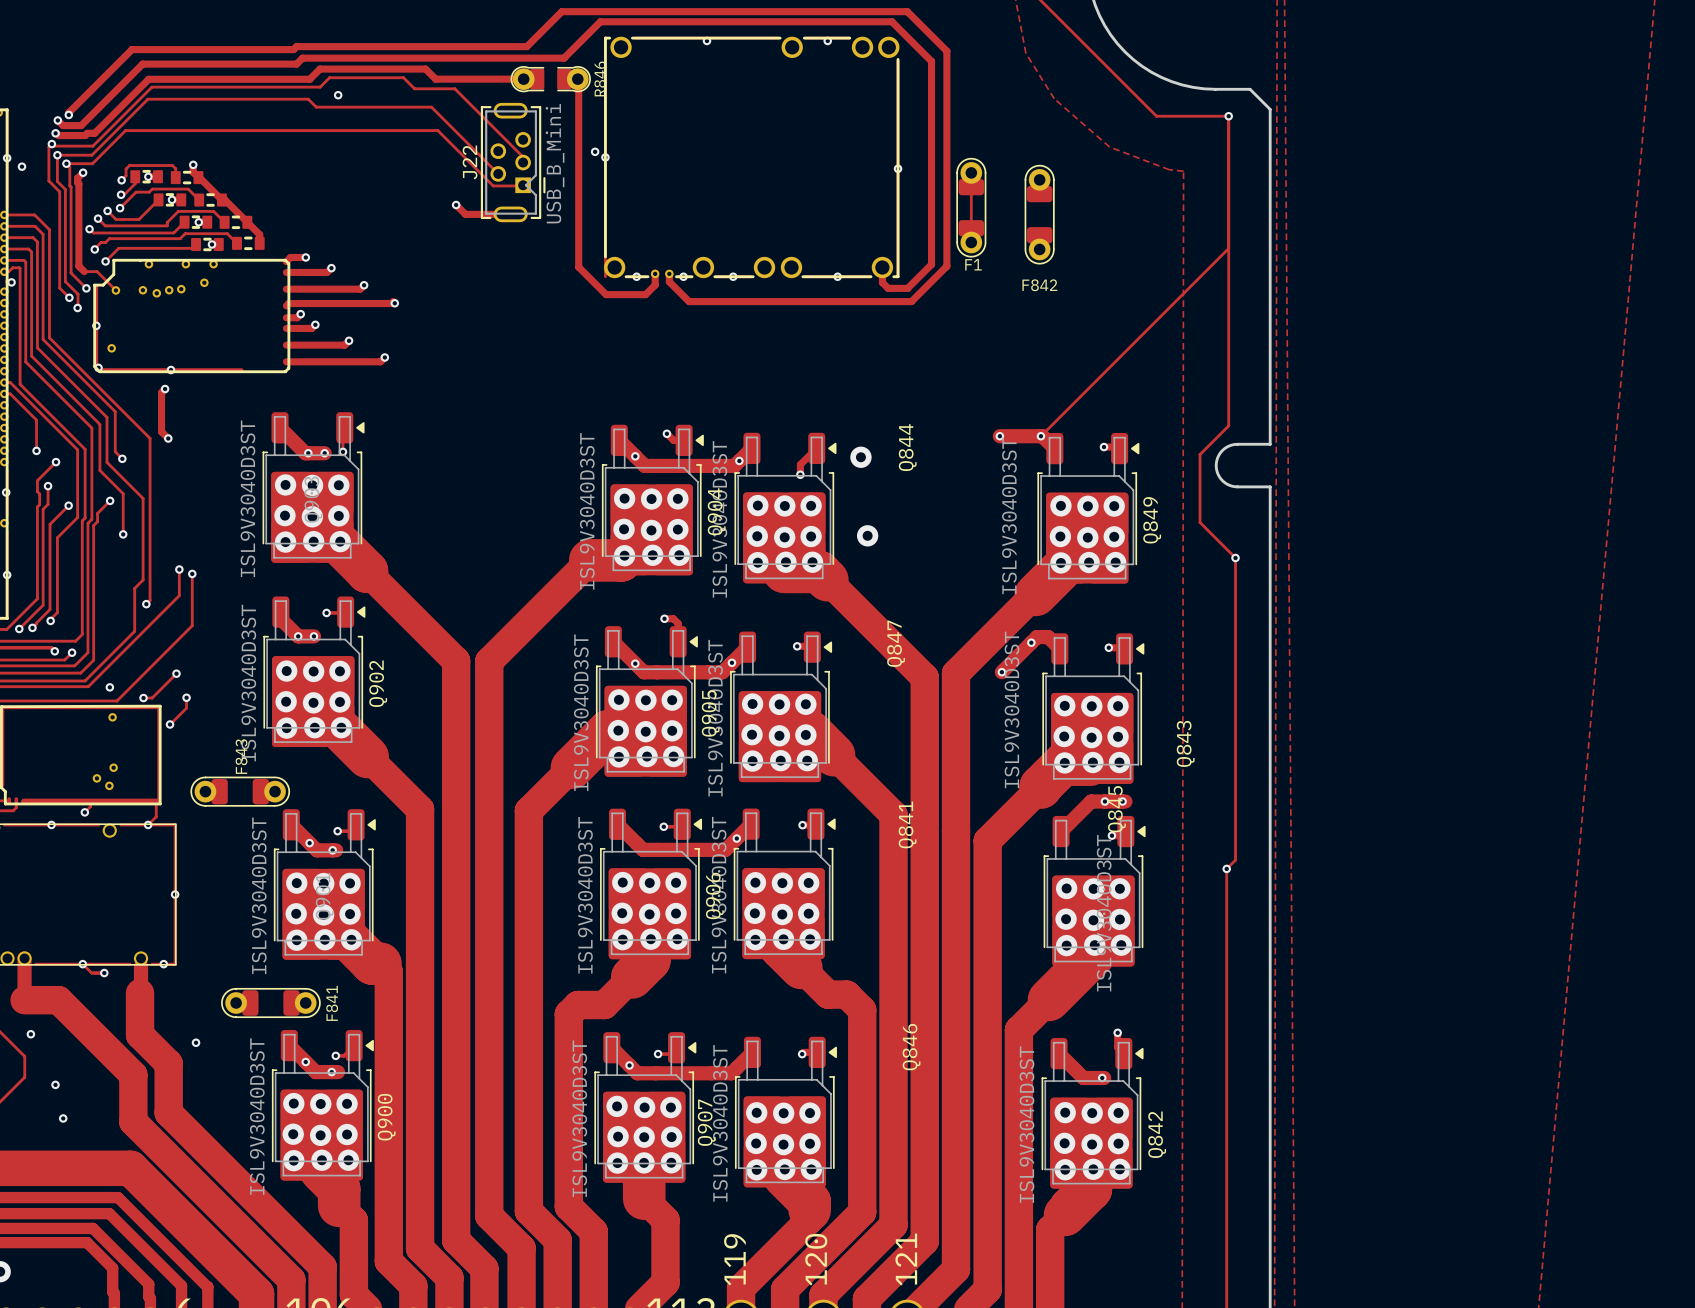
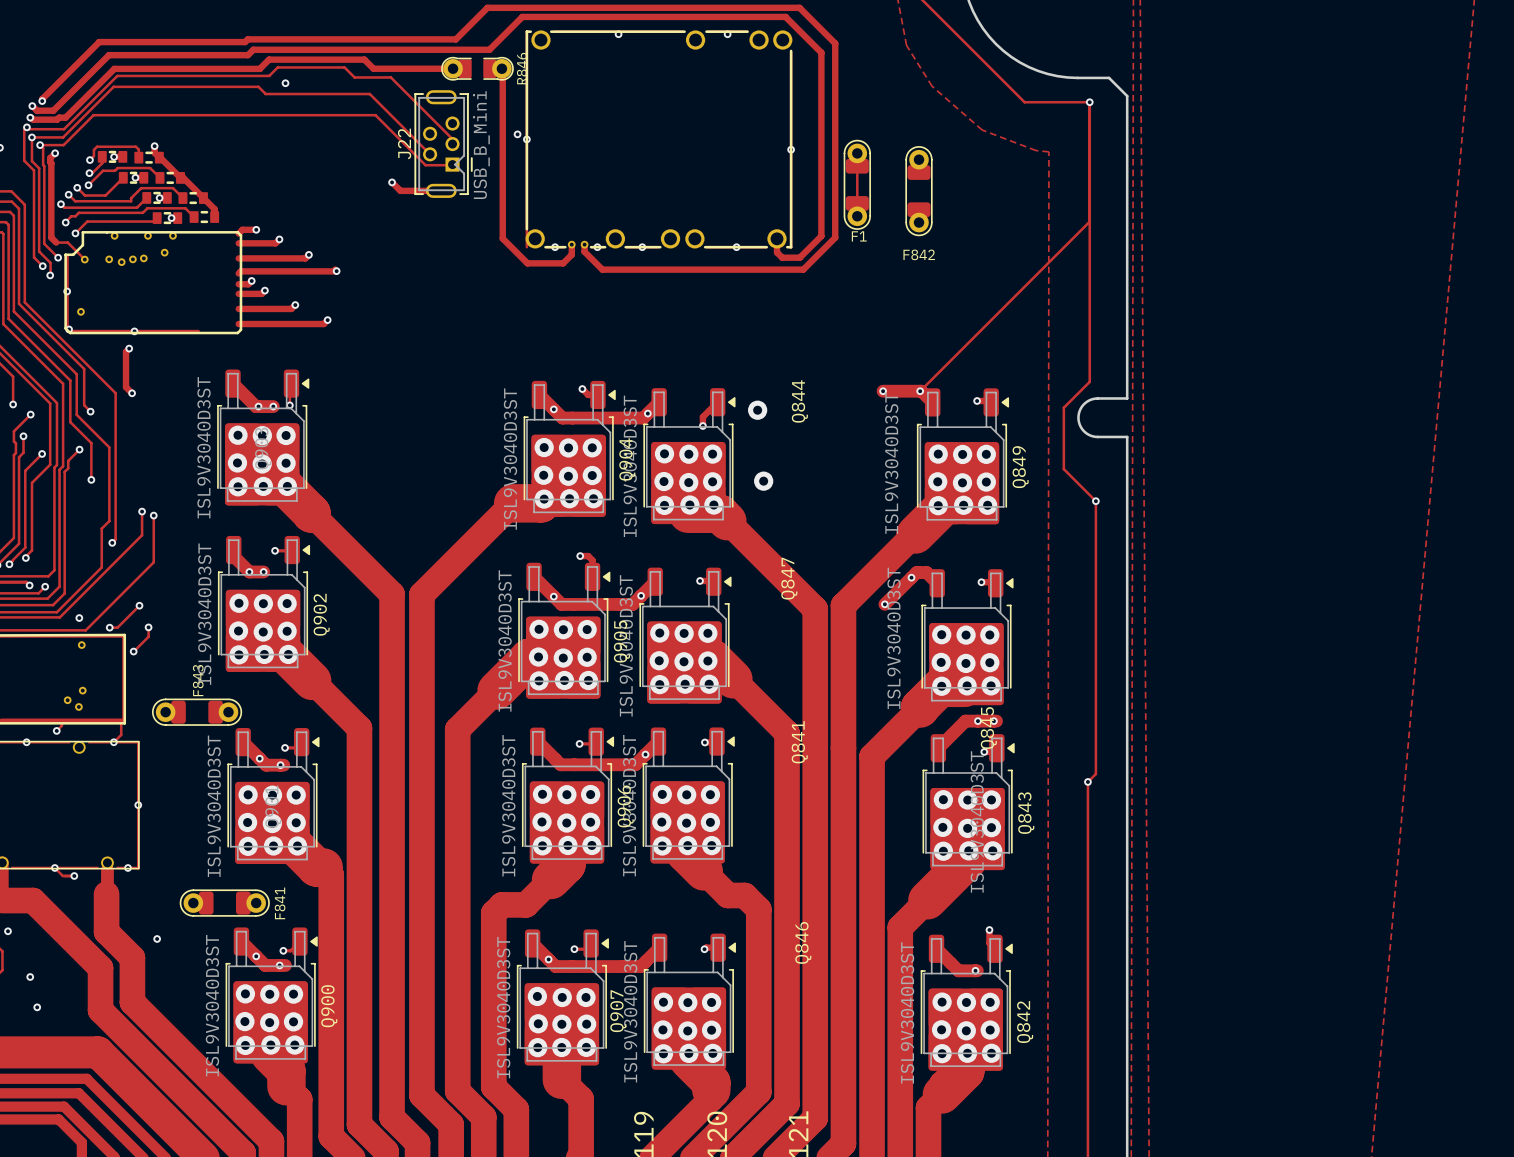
Q843 name position: Q843 (1185, 743) -> Q843 (1026, 813)

